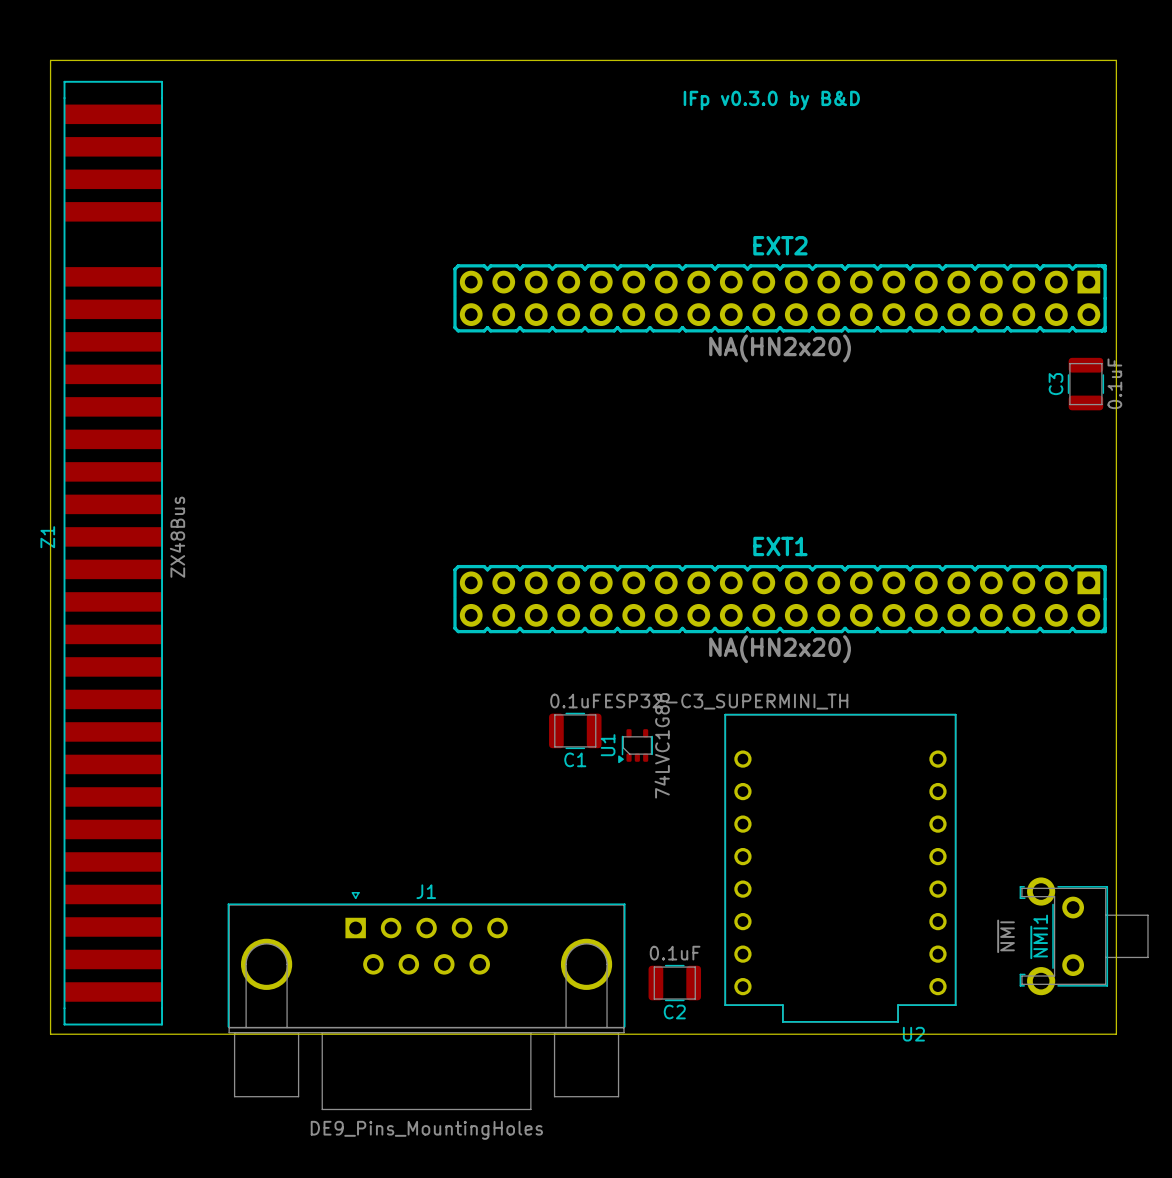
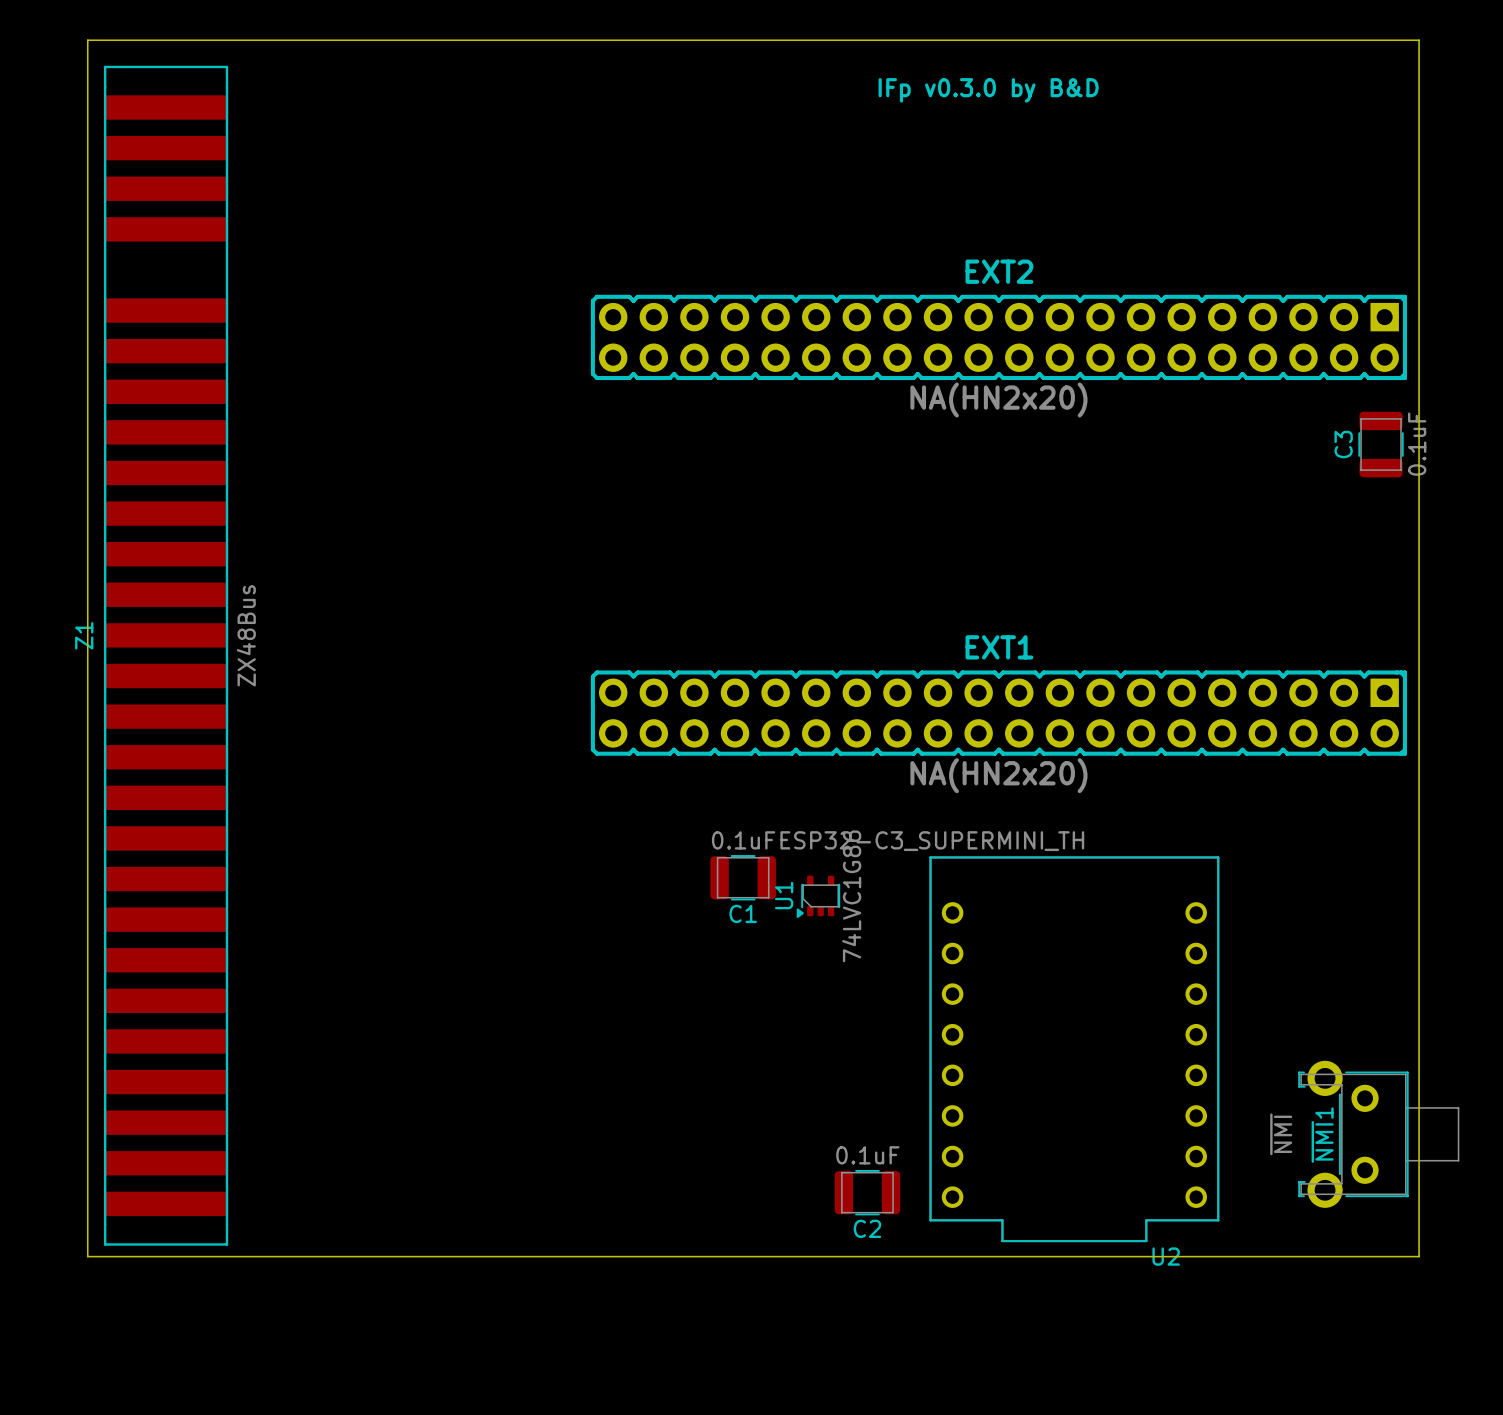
J1: DE9_Pins_MountingHoles (426, 1001) -> none

